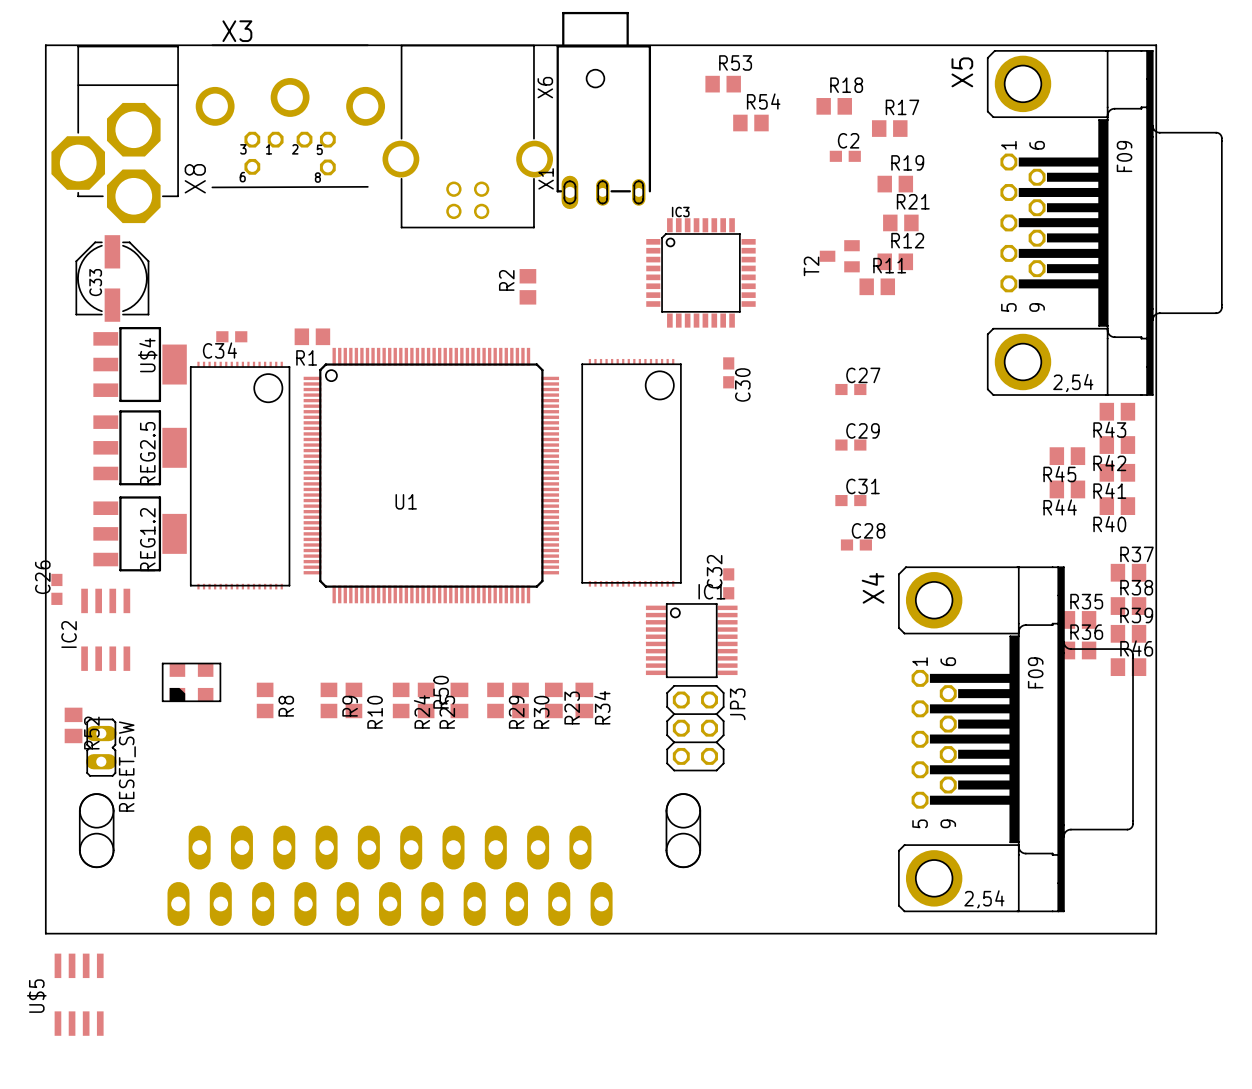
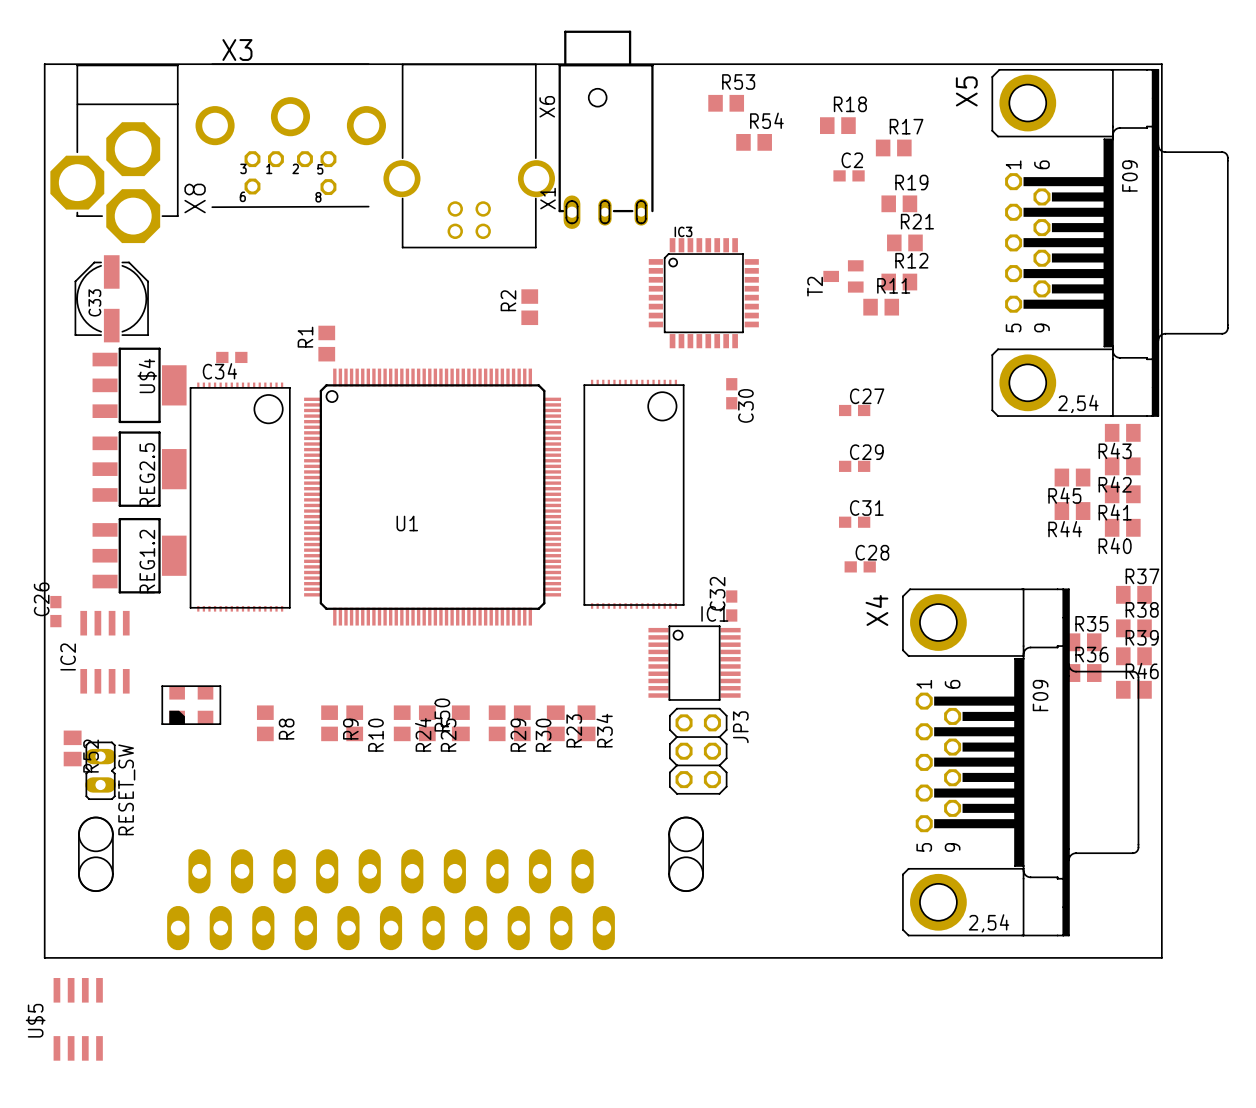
R1 rotation: 0° (312, 336) -> 90° clockwise (326, 343)

